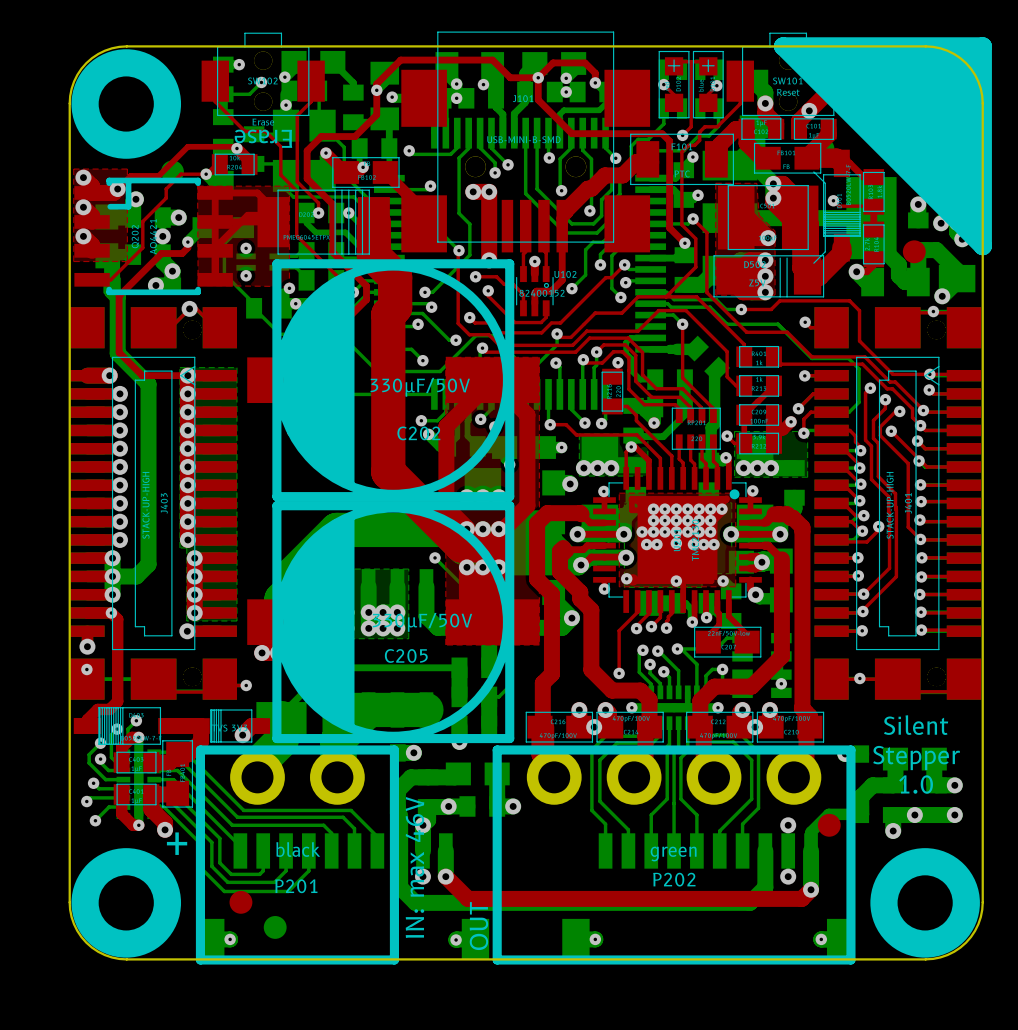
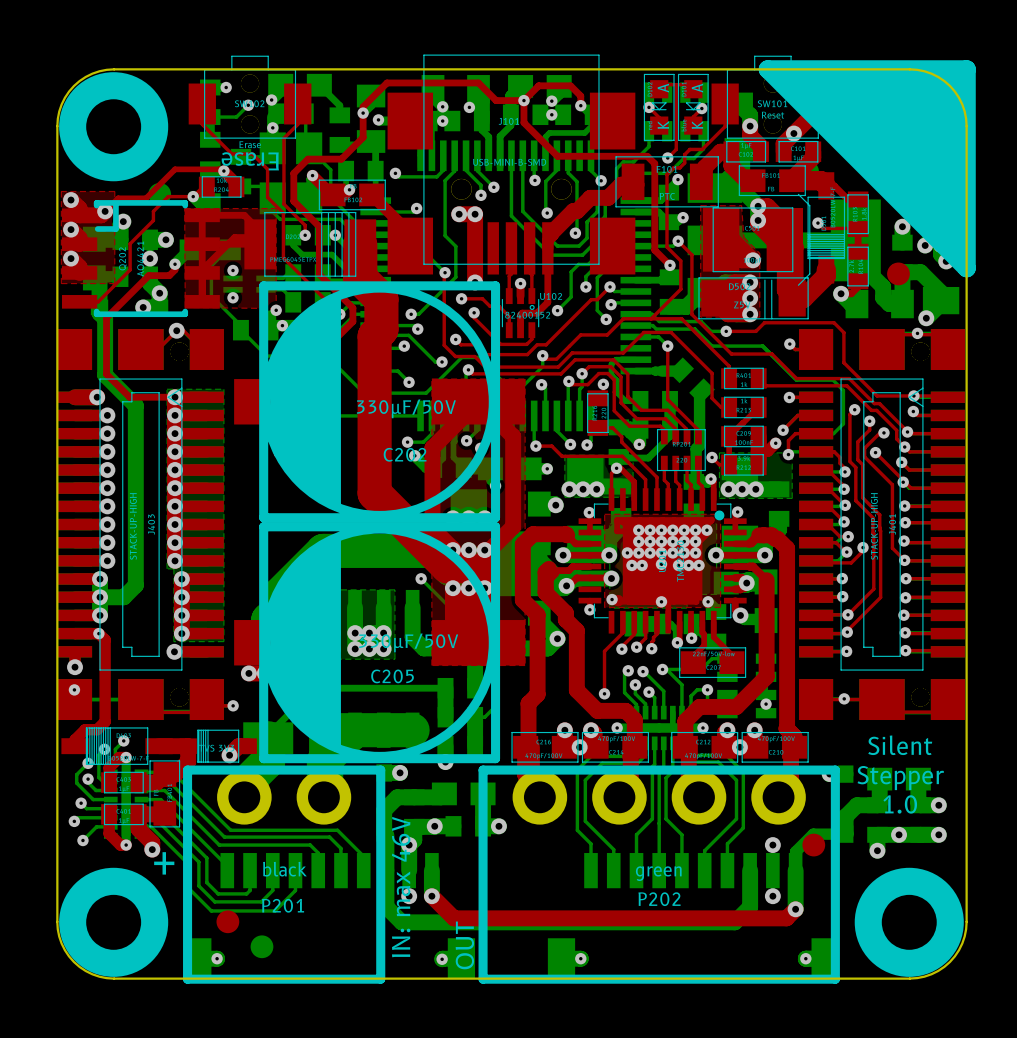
part footprint: [659, 51, 689, 118] -> [644, 74, 675, 141]
part footprint: [693, 51, 724, 118] -> [678, 74, 709, 141]

